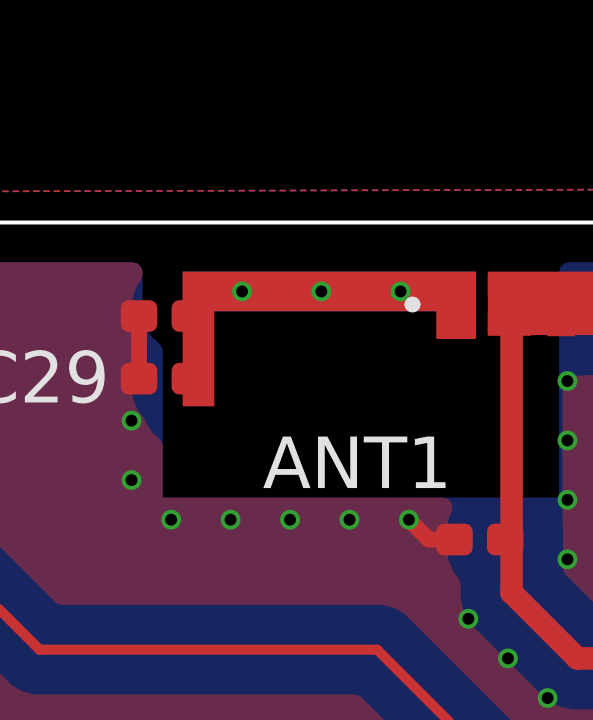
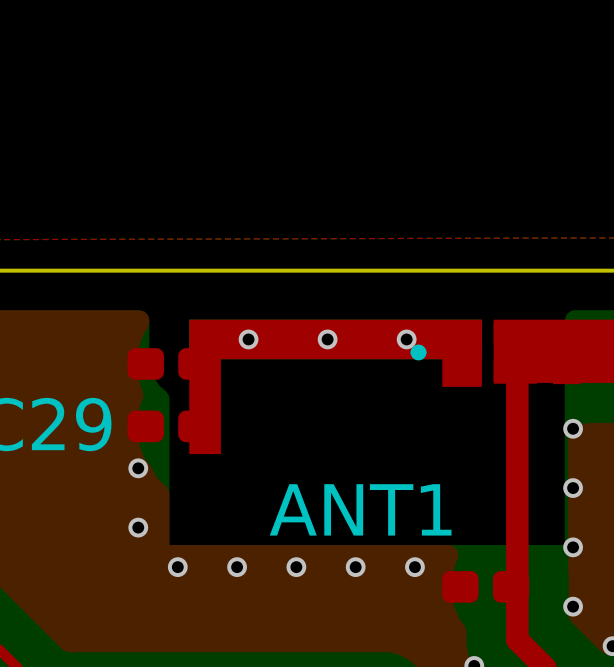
top track: (139, 316) (139, 378) -> none
top track: (408, 519) (428, 539) (454, 539) -> none

